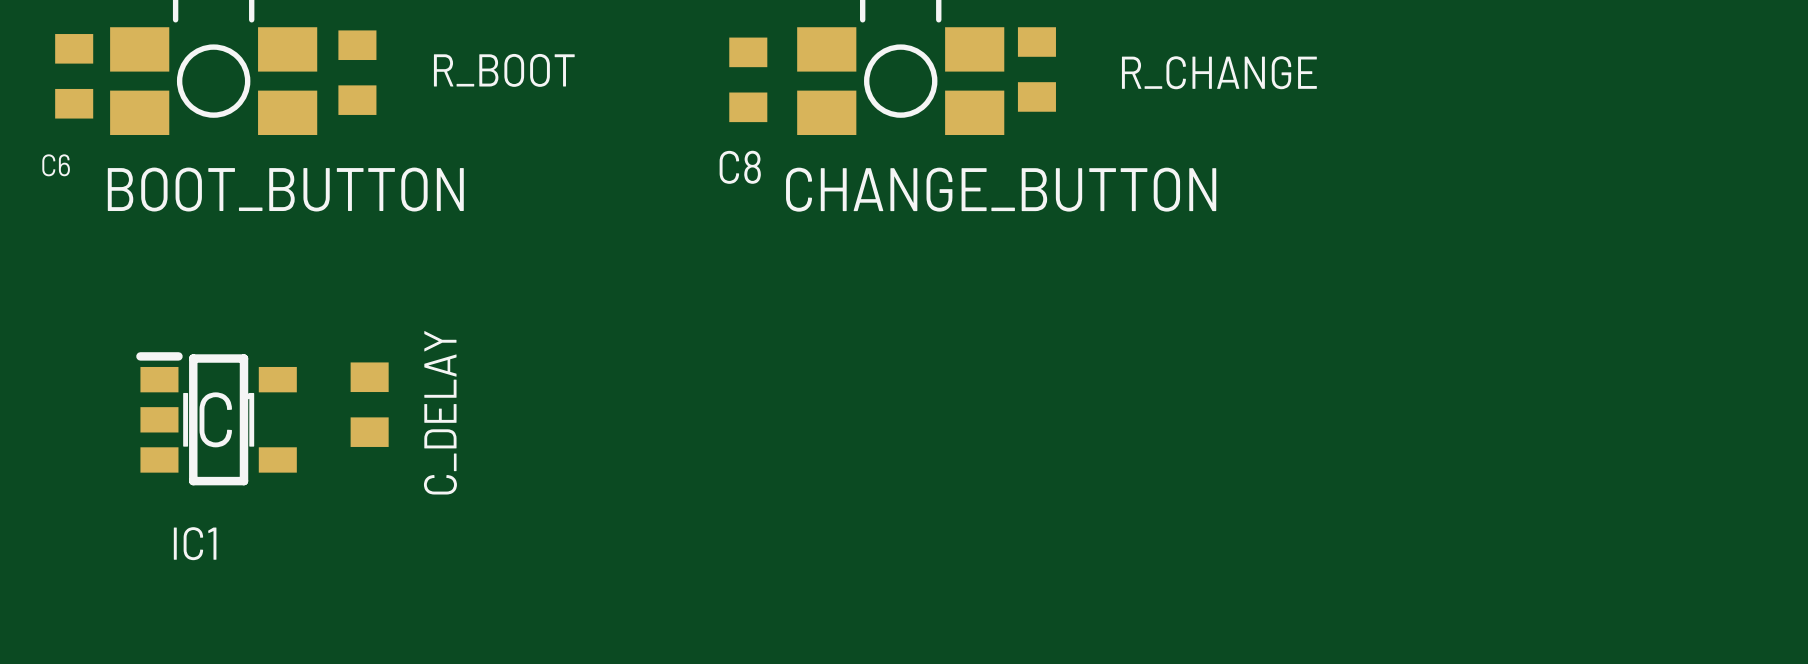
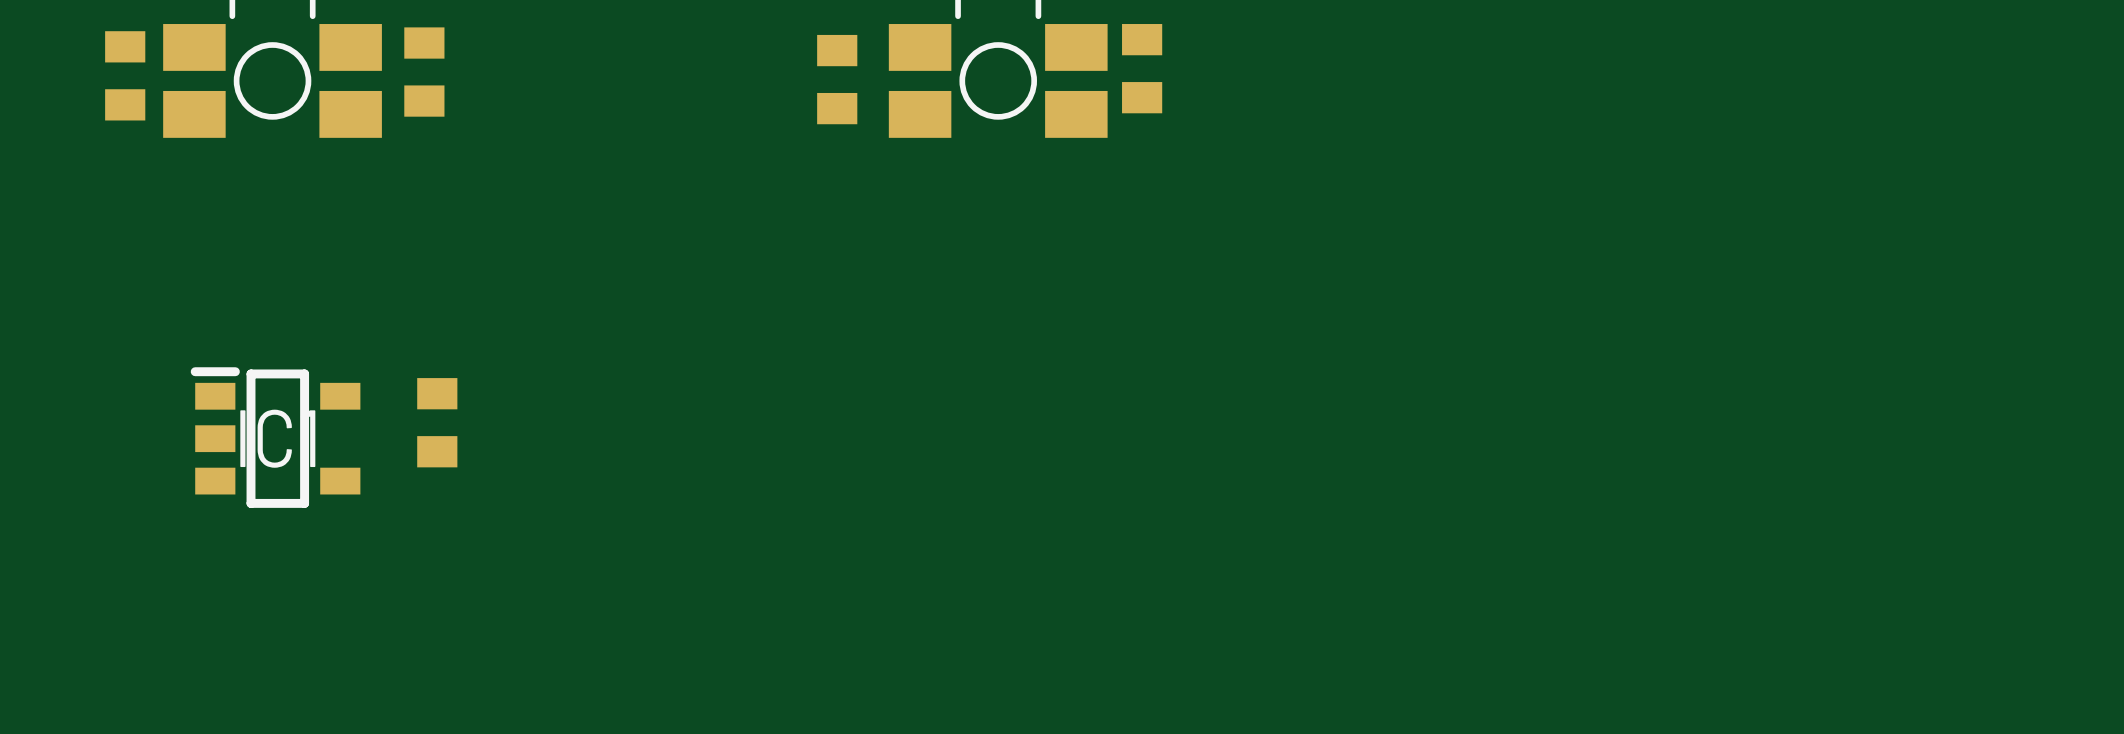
text: R_BOOT (504, 70) -> none
text: R_CHANGE (1219, 72) -> none
text: C6 (56, 165) -> none
text: C8 (740, 167) -> none
text: BOOT_BUTTON (285, 189) -> none
text: CHANGE_BUTTON (1001, 189) -> none
text: C_DELAY (440, 412) -> none
text: IC1 (195, 543) -> none

